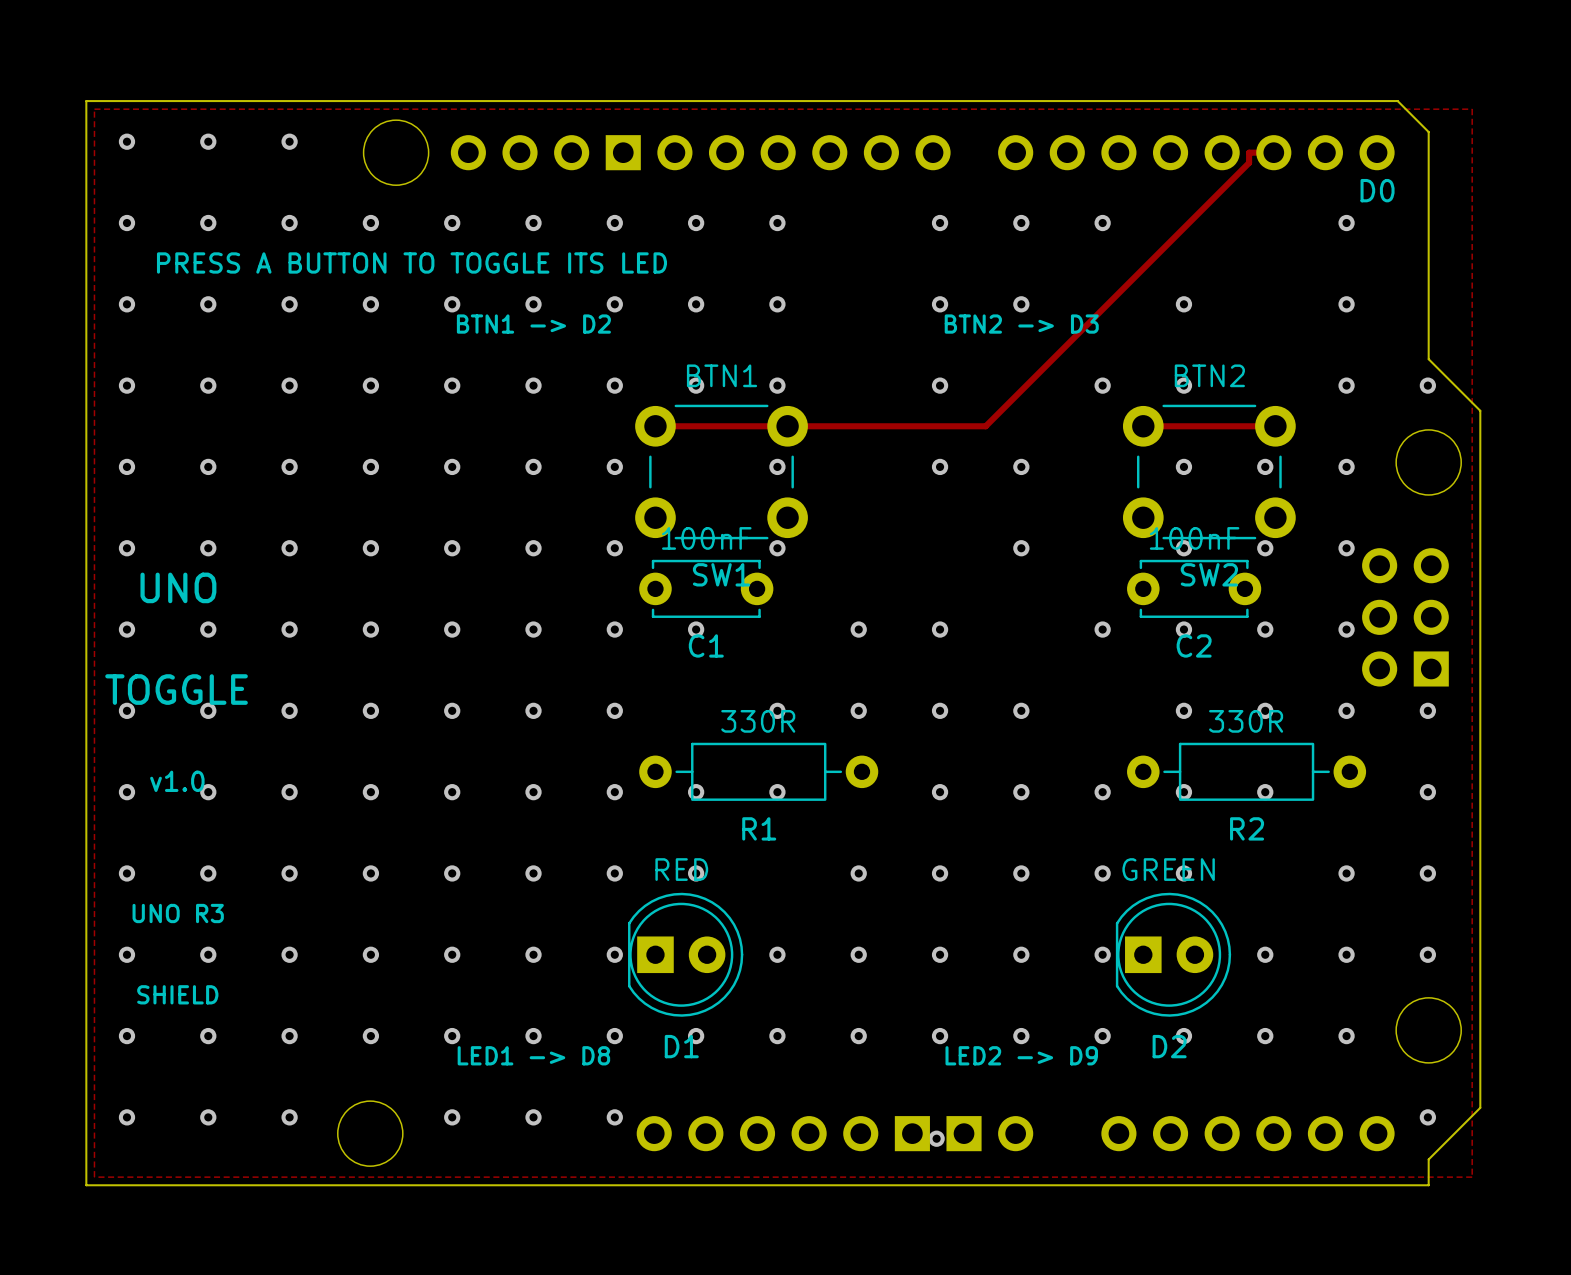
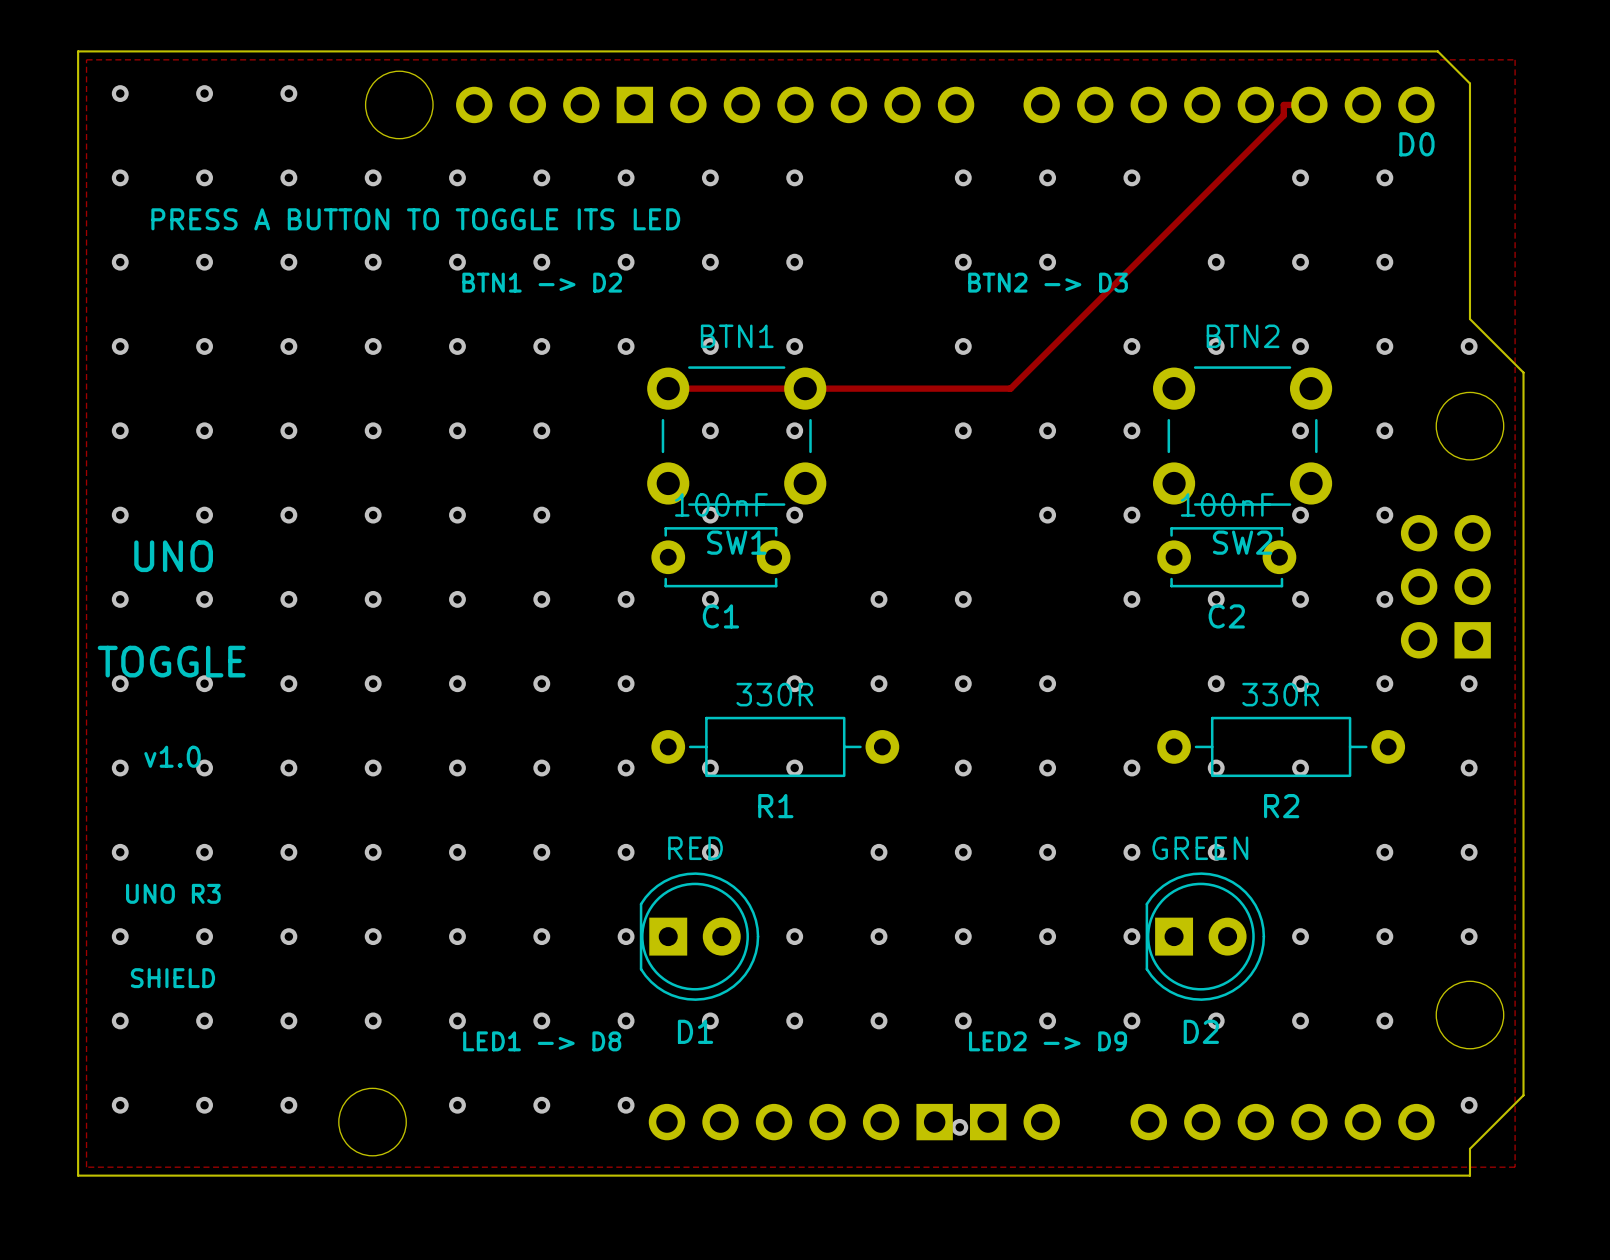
via: none -> (1300, 177)
via: none -> (1300, 262)
via: none -> (1300, 346)
track: (1143, 426) (1275, 426) -> none
via: (614, 466) -> none
via: none -> (710, 430)
via: none -> (1131, 430)
via: (1183, 466) -> none
via: (614, 548) -> none
via: none -> (710, 515)
via: none -> (1131, 515)
via: (1183, 548) -> none

